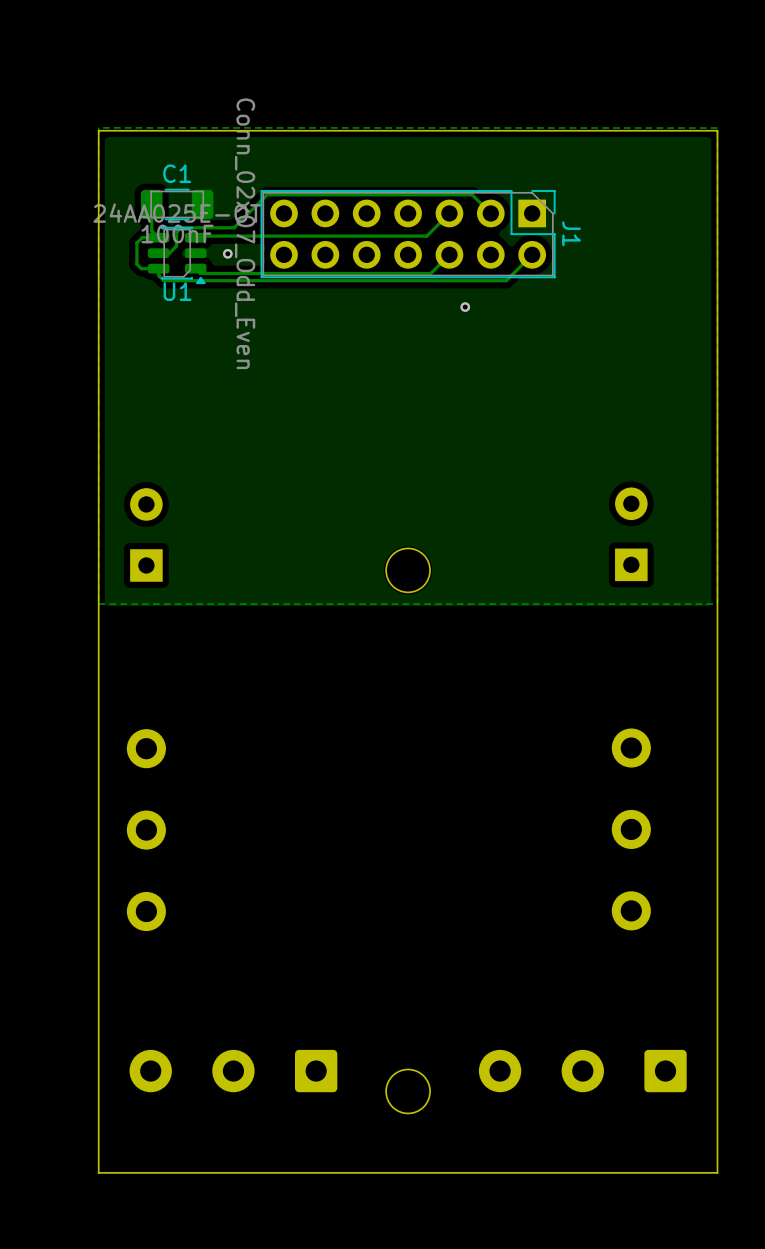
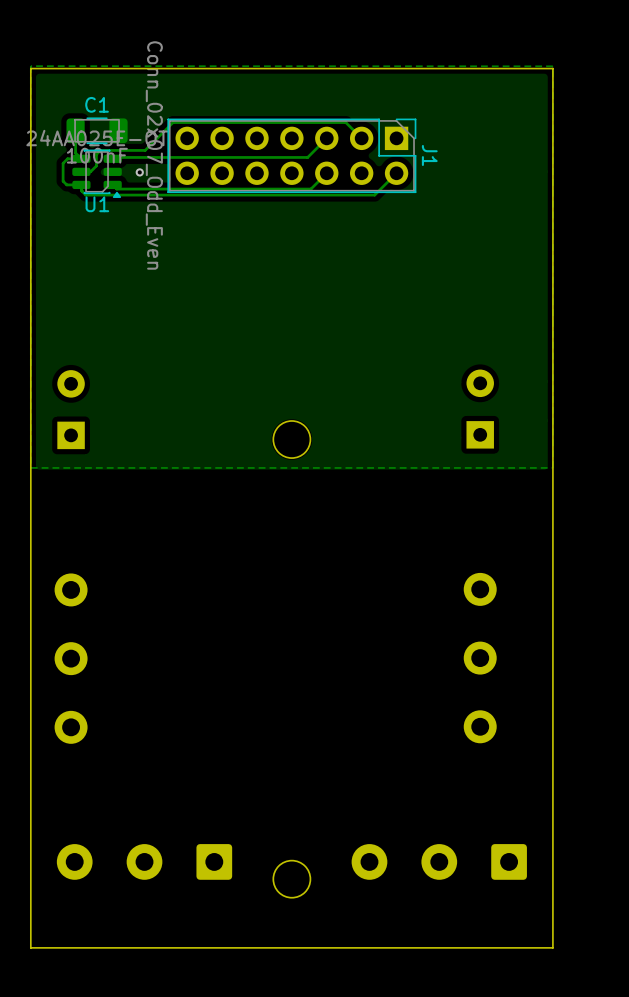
via: (465, 307) -> none

